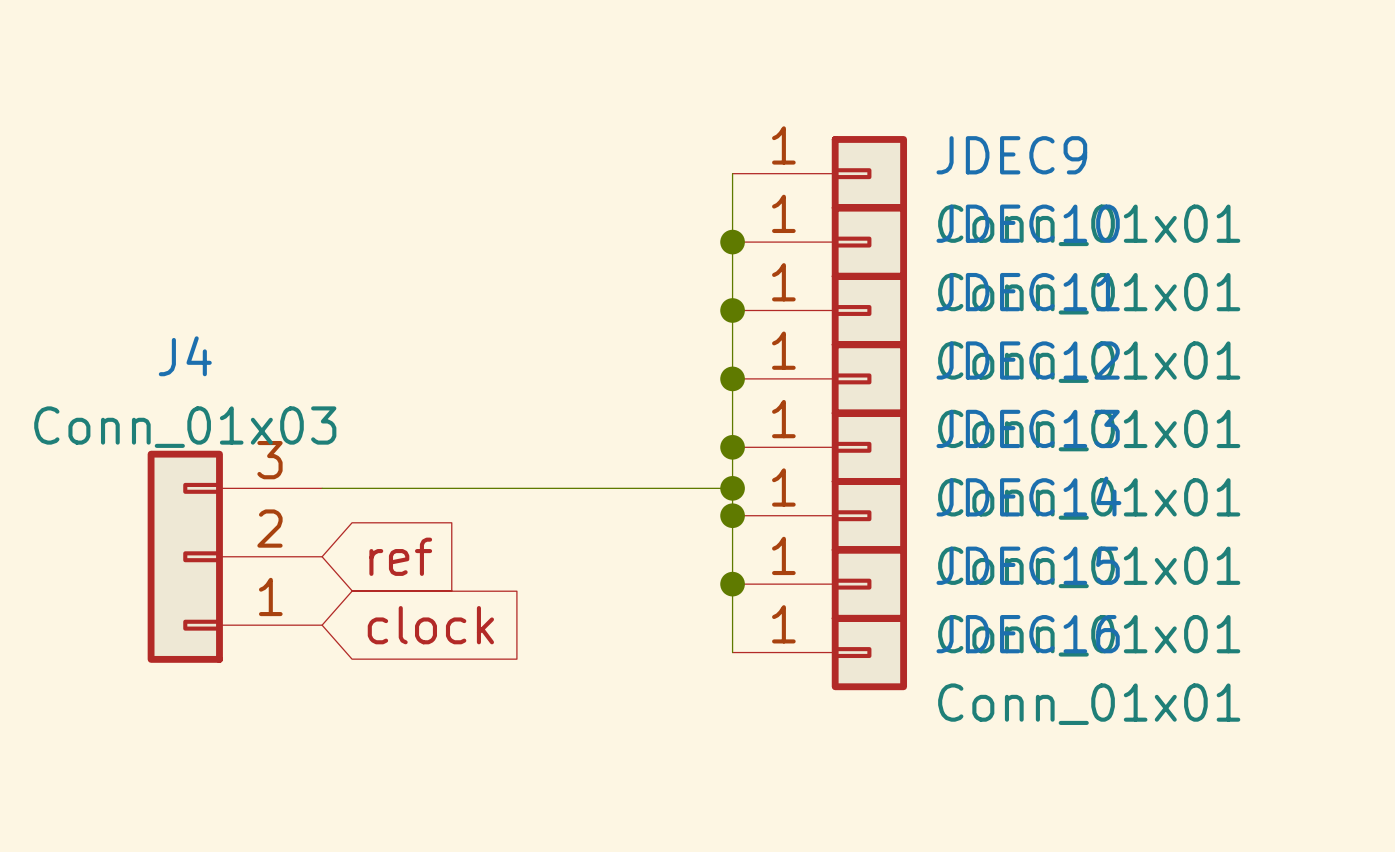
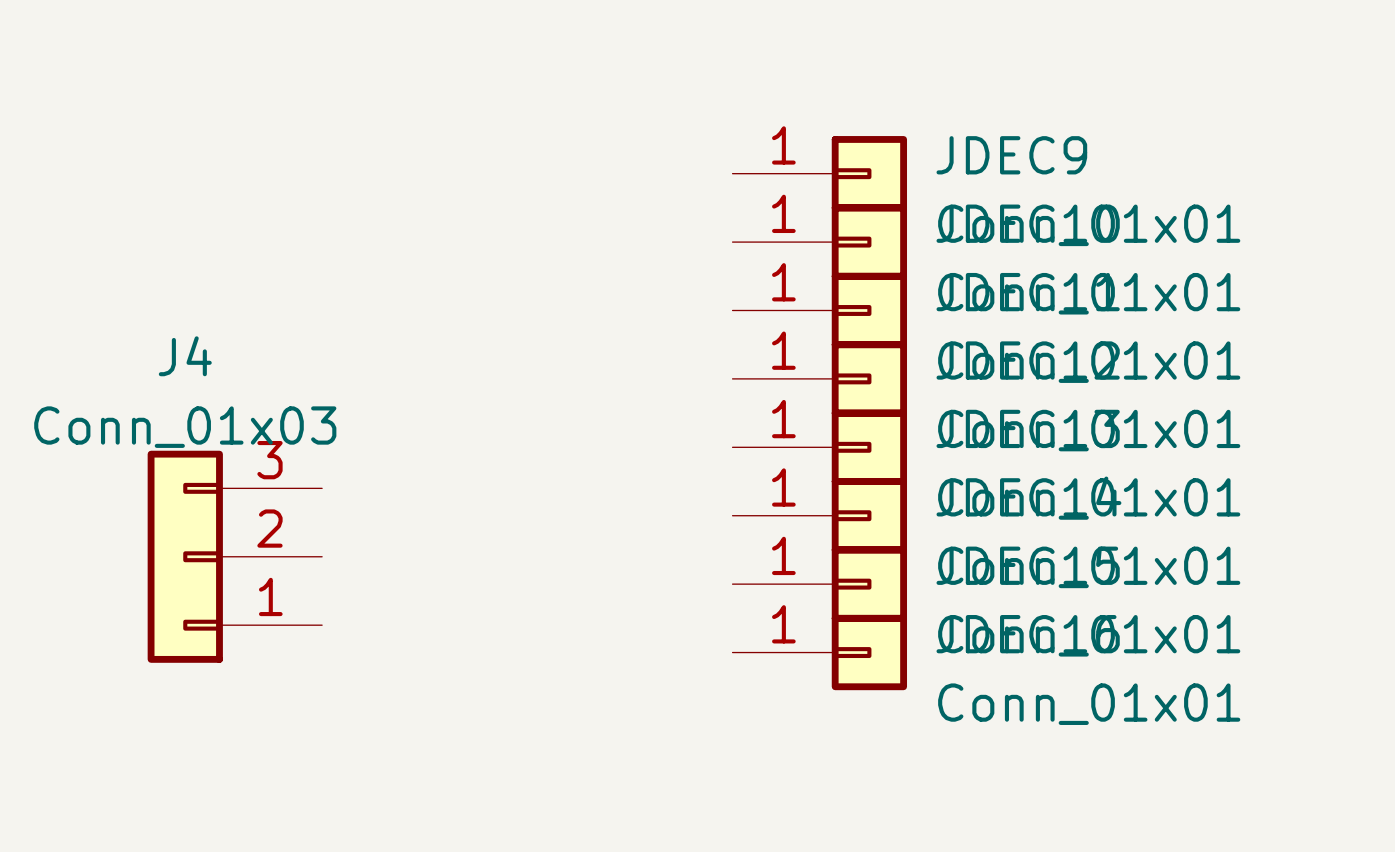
wire: (732, 173) (732, 652) -> none
junction: (732, 242) -> none
junction: (732, 310) -> none
junction: (732, 378) -> none
junction: (732, 447) -> none
wire: (322, 488) (732, 488) -> none
junction: (732, 488) -> none
junction: (732, 515) -> none
global label: ref (400, 556) -> none
junction: (732, 584) -> none
global label: clock (430, 625) -> none

